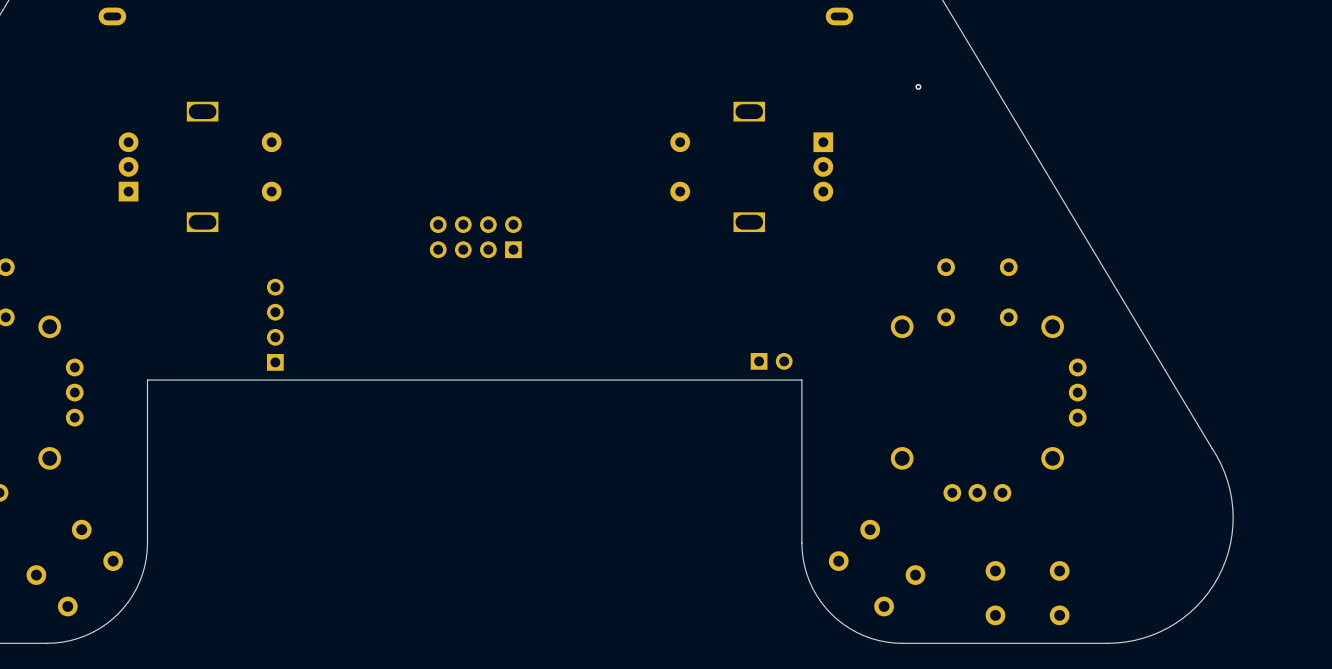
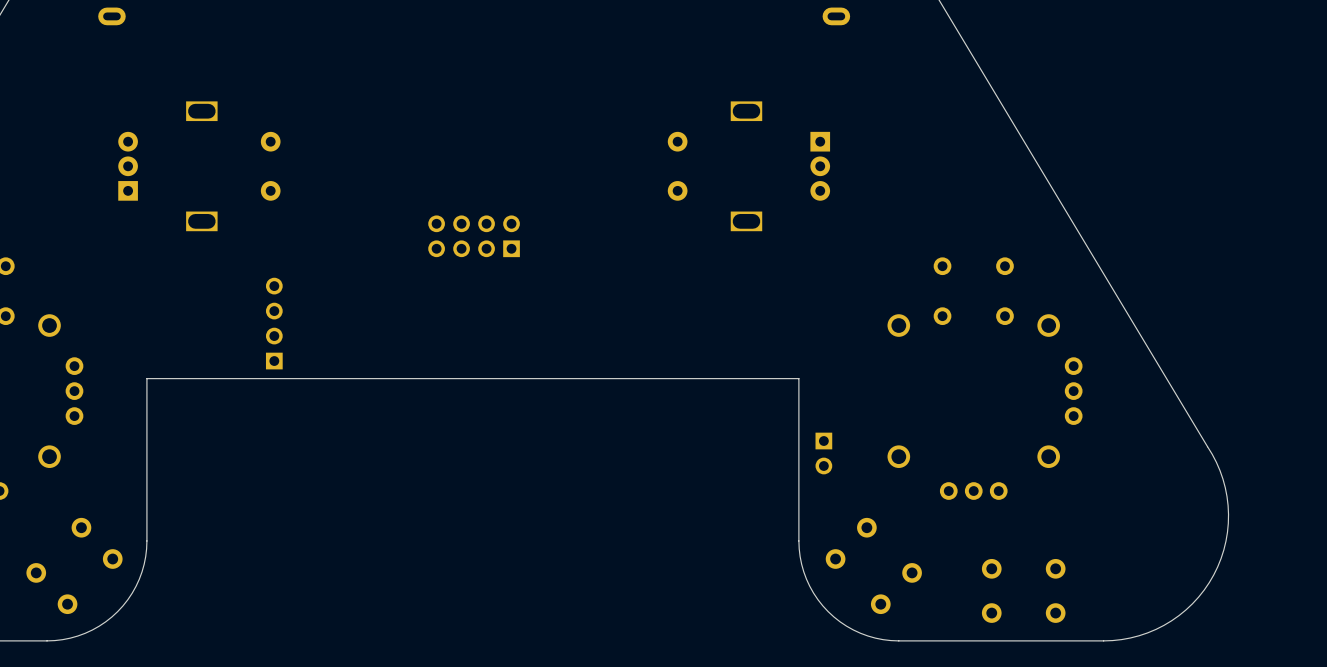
via: (918, 86) -> none
part rotation: 0° (771, 361) -> 90° clockwise (823, 453)
part position: (771, 361) -> (823, 453)

